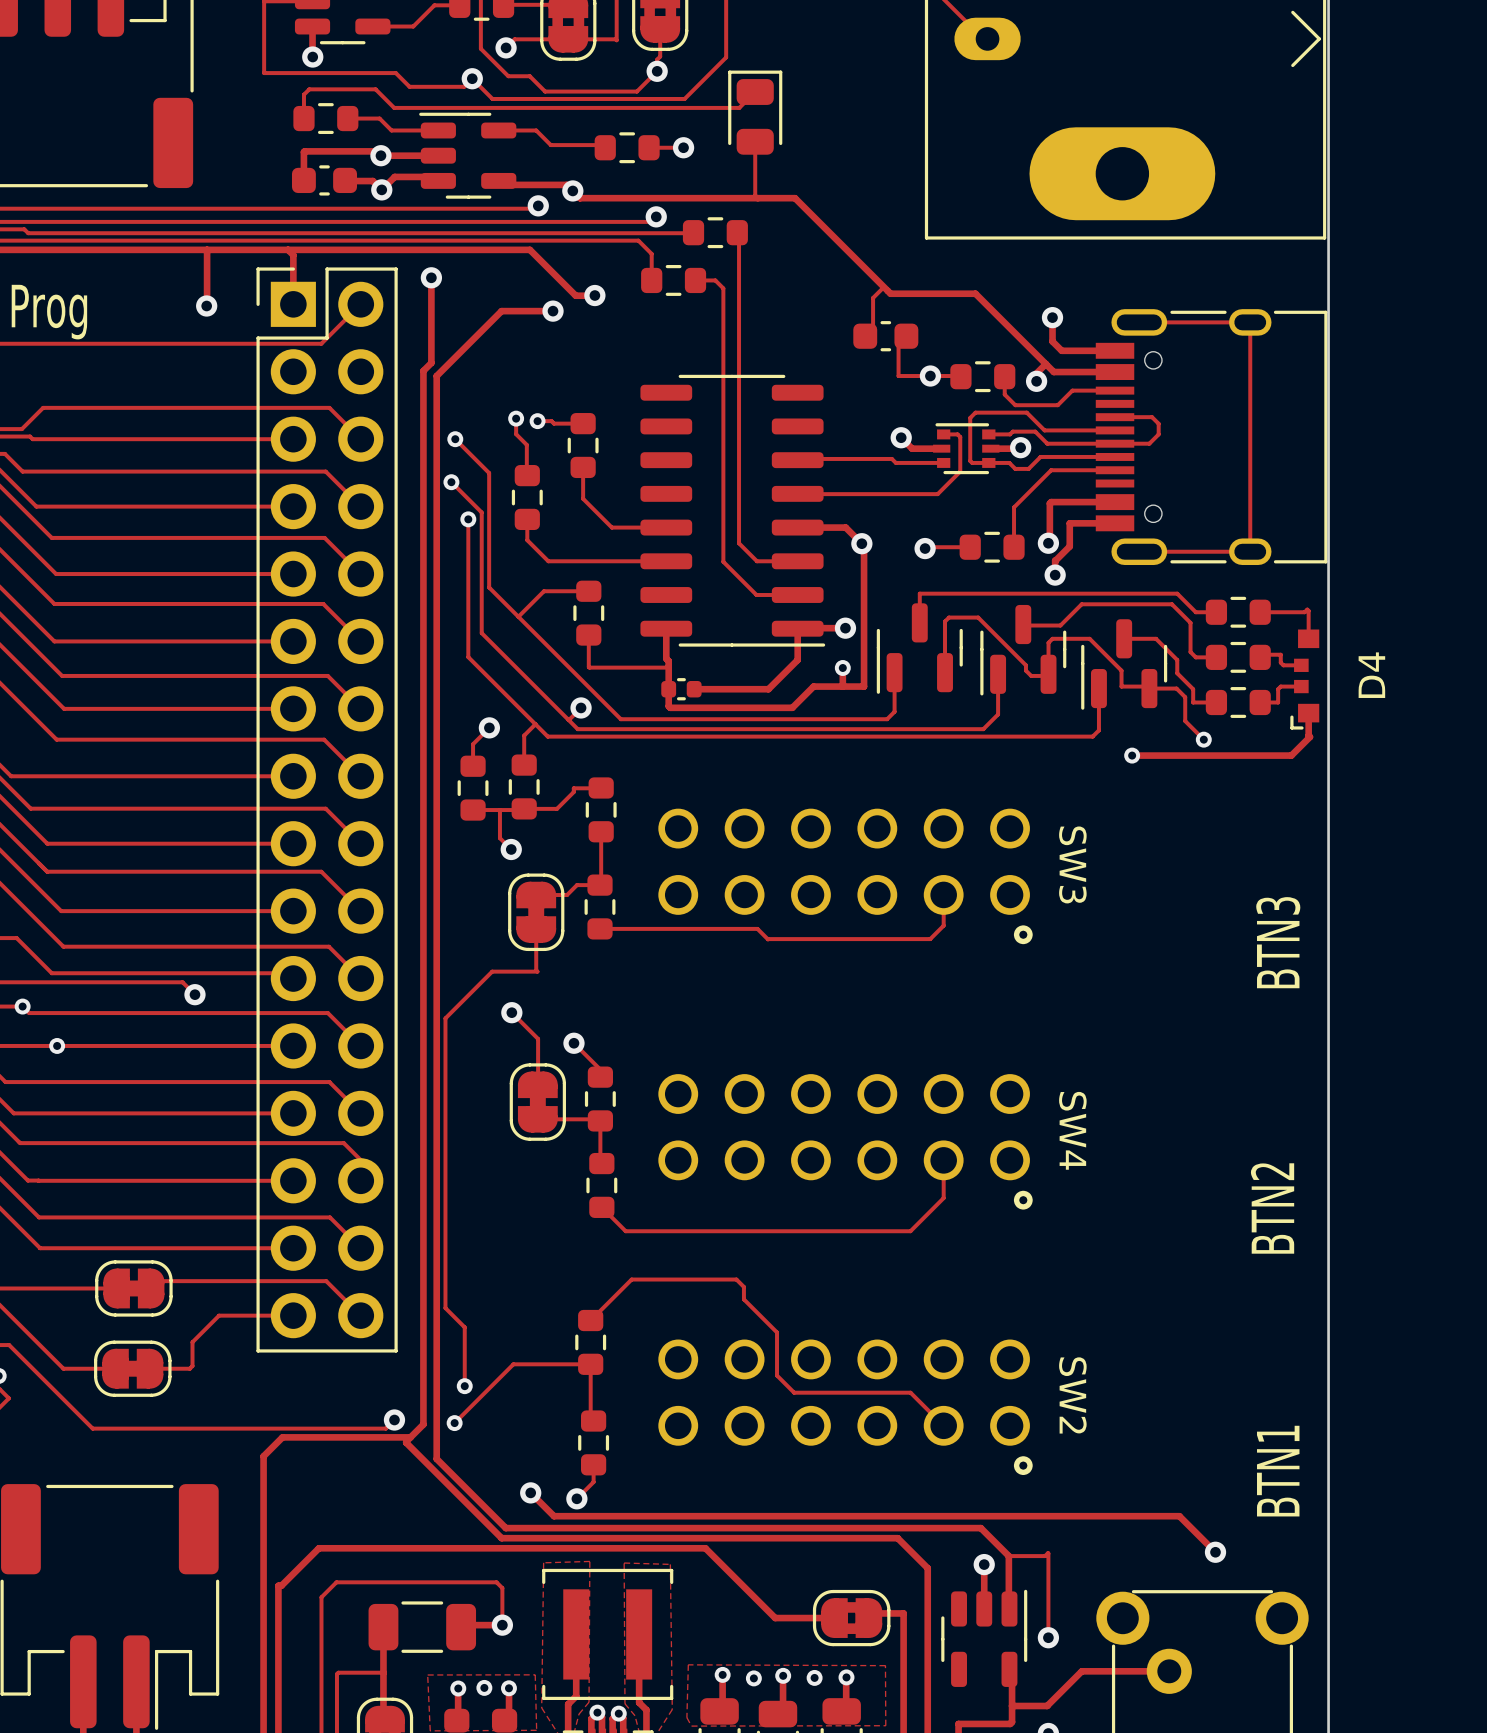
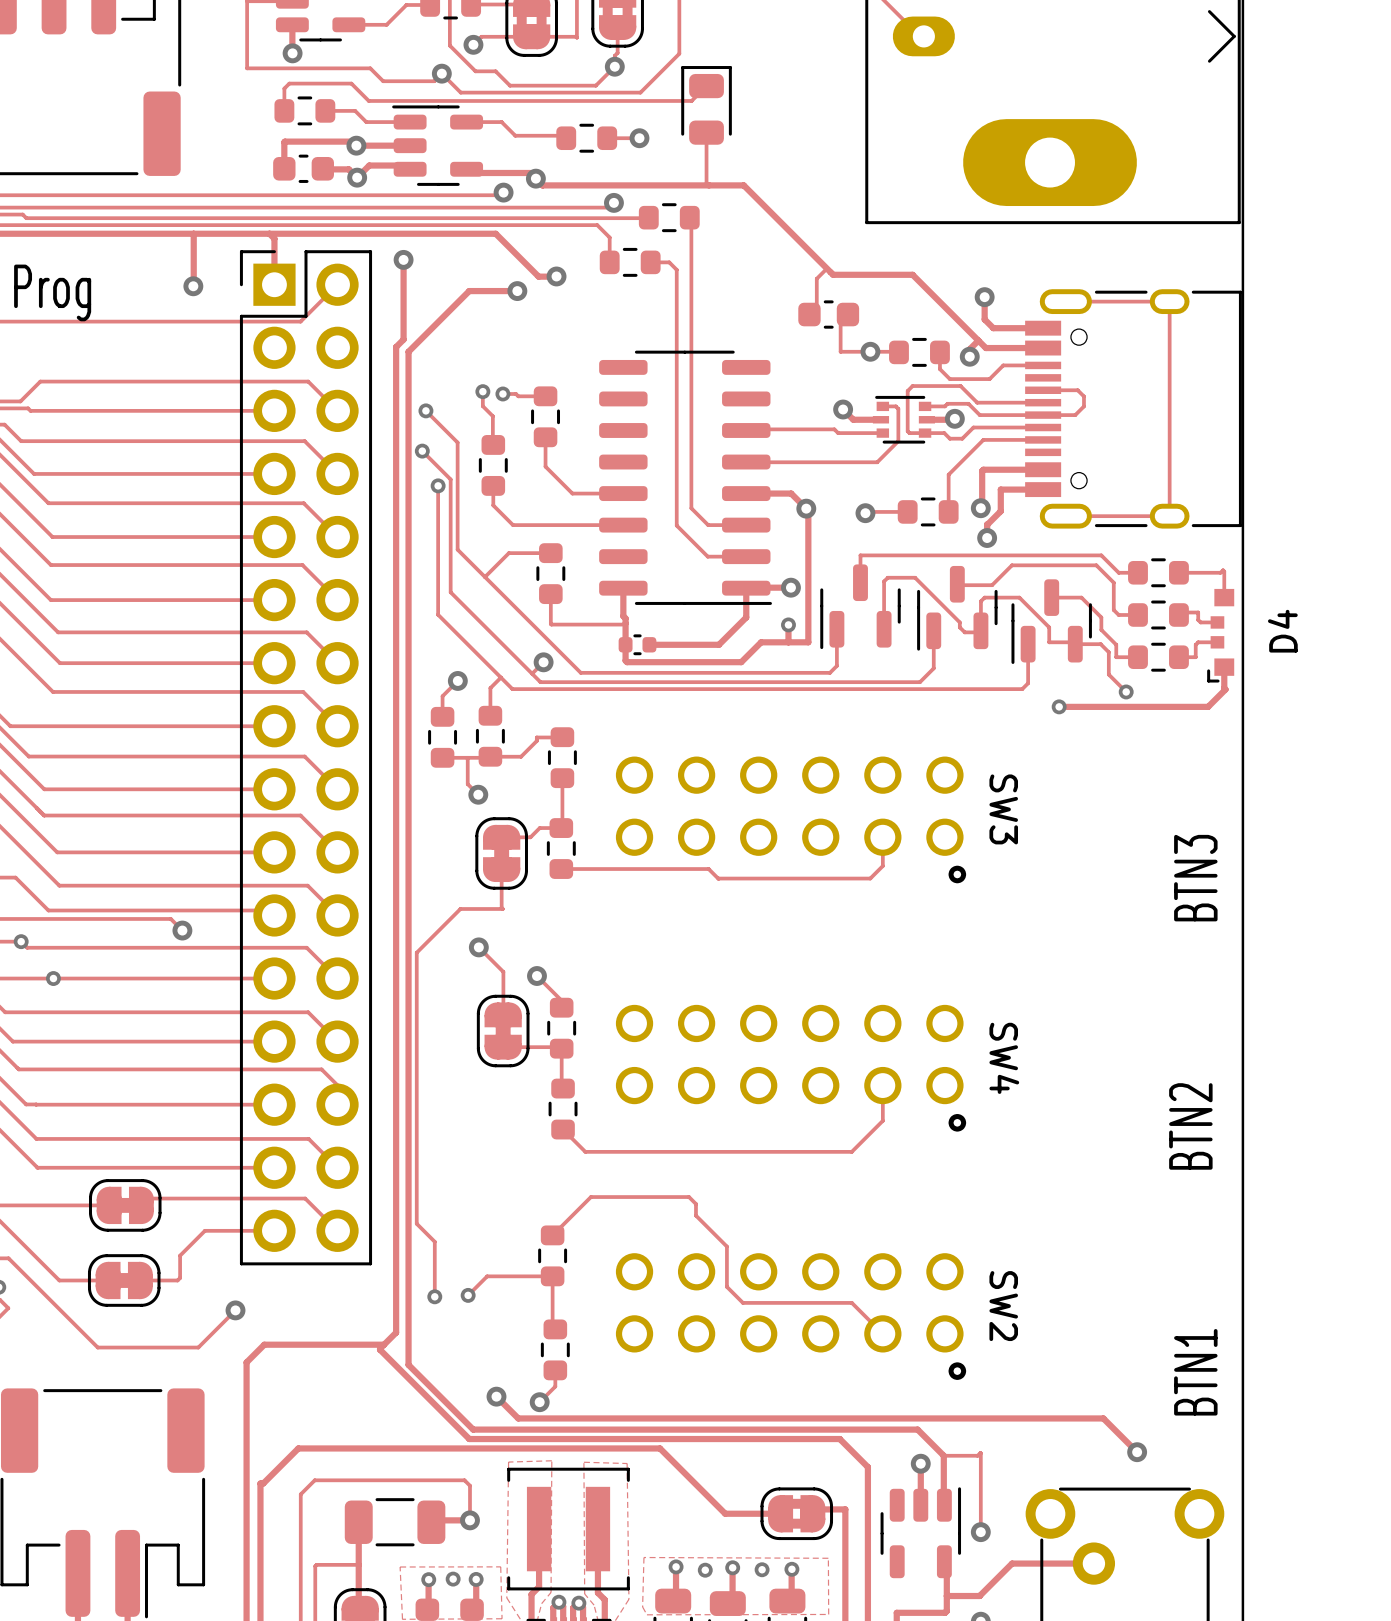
track: (520, 1364) (513, 1364) (454, 1423) -> (487, 1276) (468, 1295)
track: (394, 1420) (385, 1428) (92, 1428) -> (235, 1310) (198, 1347) (97, 1347) (86, 1336)
via position: (394, 1420) -> (235, 1310)
via position: (454, 1423) -> (468, 1295)

